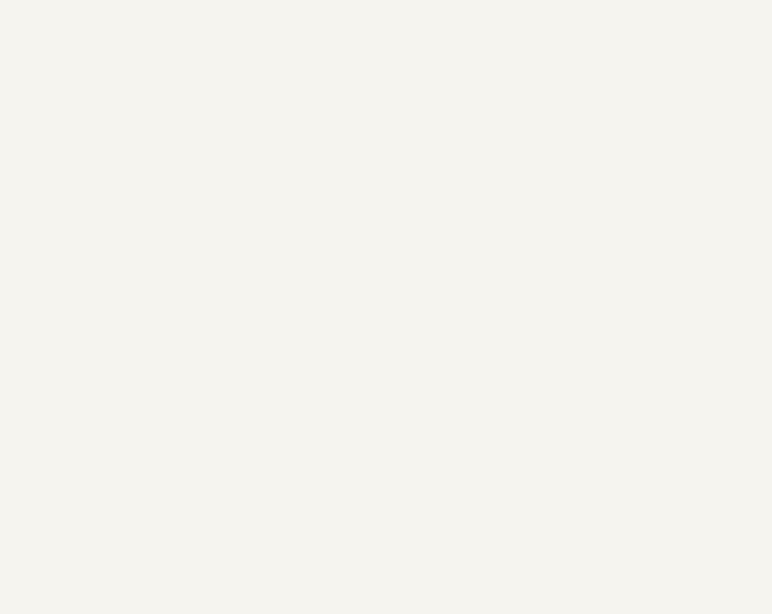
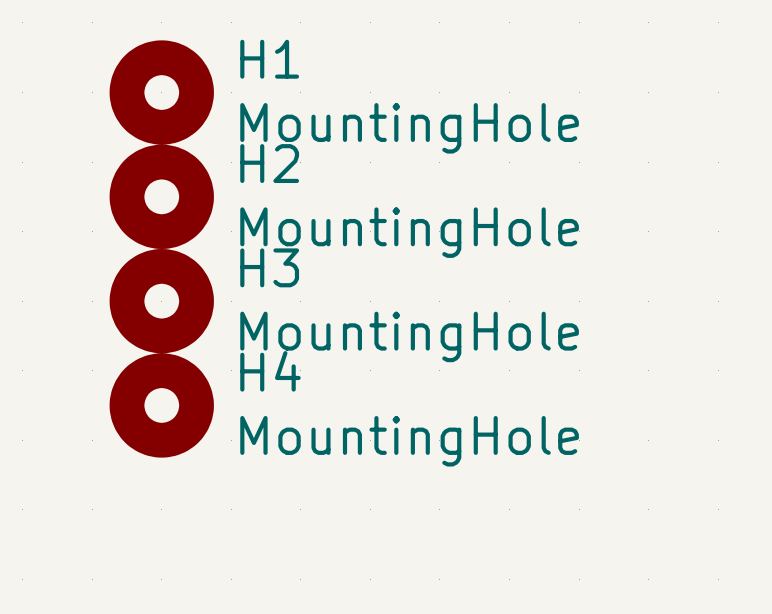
H1: none -> MountingHole (161, 92)
H2: none -> MountingHole (161, 196)
H3: none -> MountingHole (161, 301)
H4: none -> MountingHole (161, 405)

